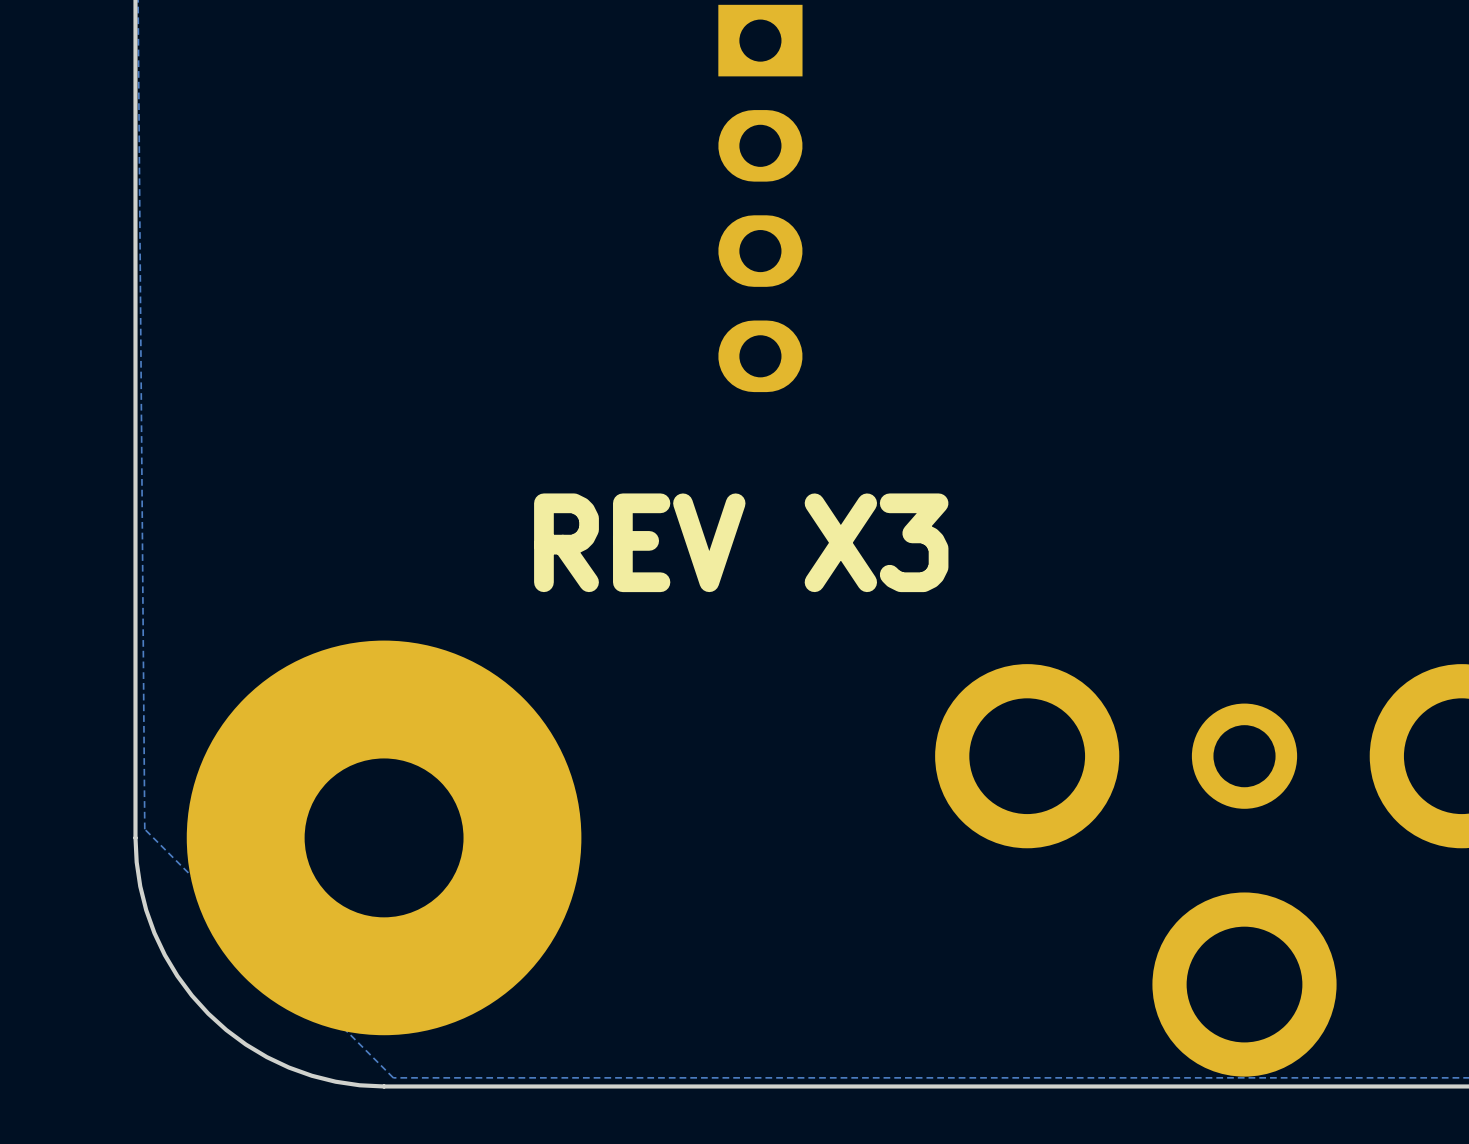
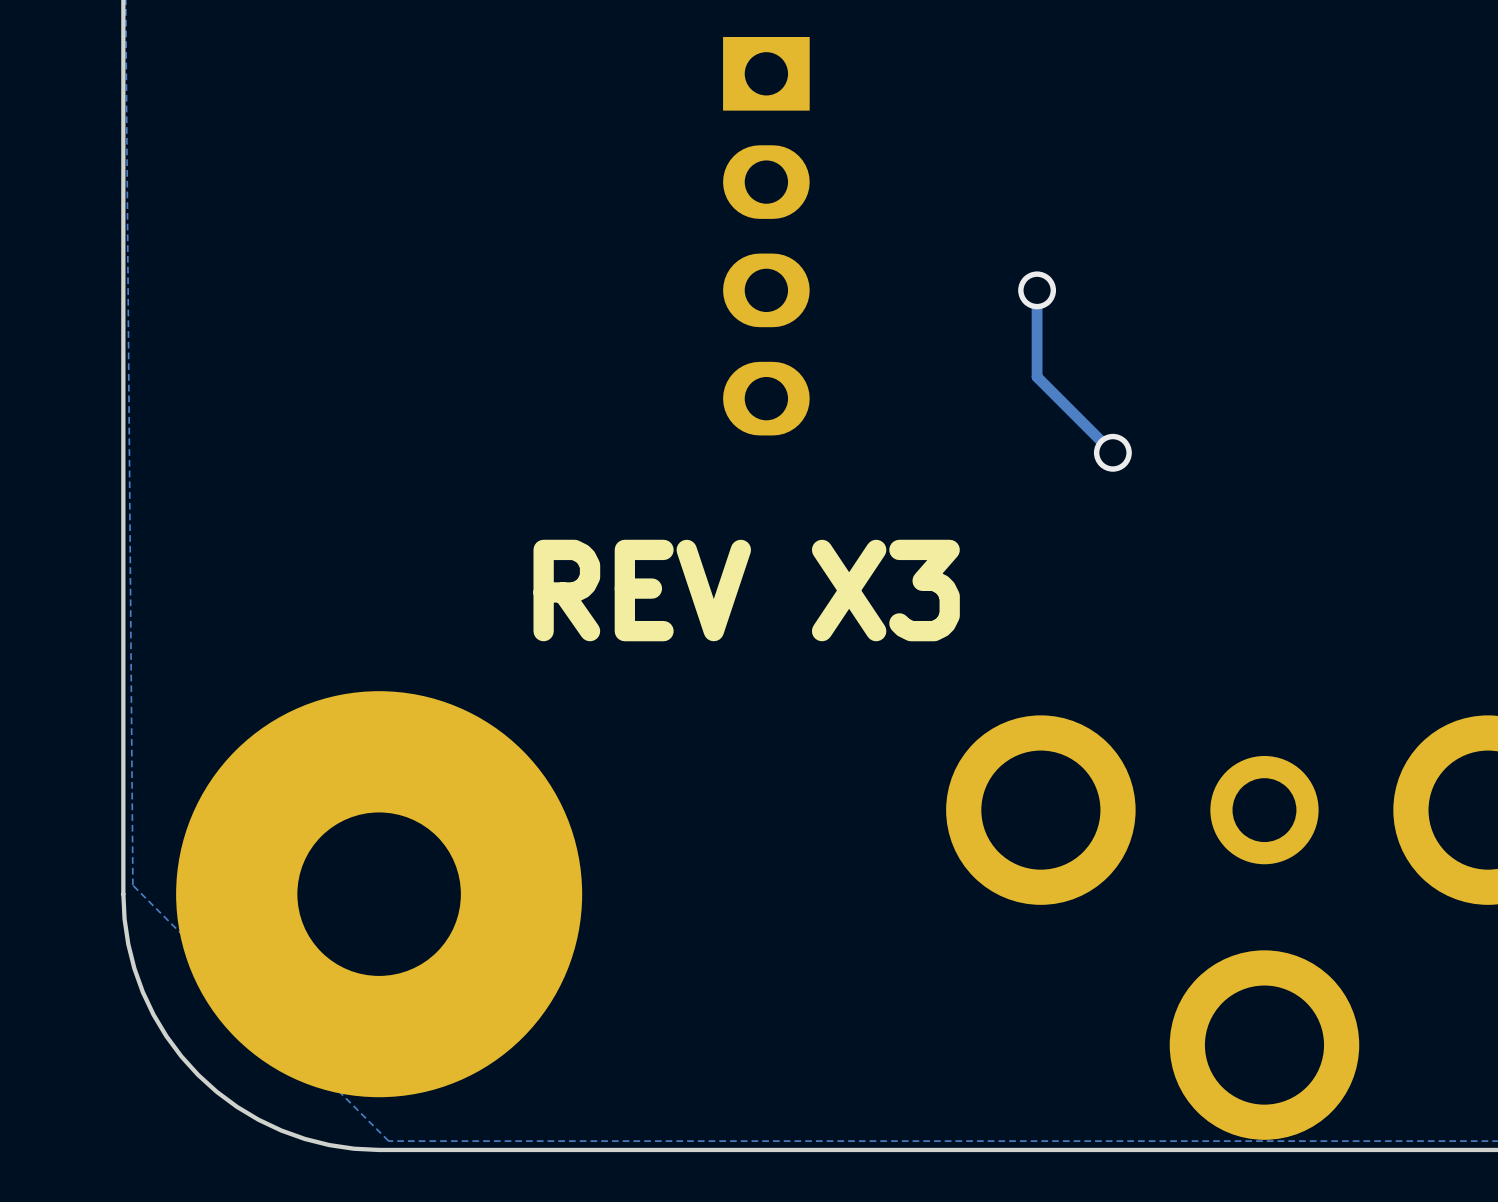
track: none -> (1037, 290) (1037, 376) (1112, 452)
via: none -> (1037, 290)
via: none -> (1112, 452)

